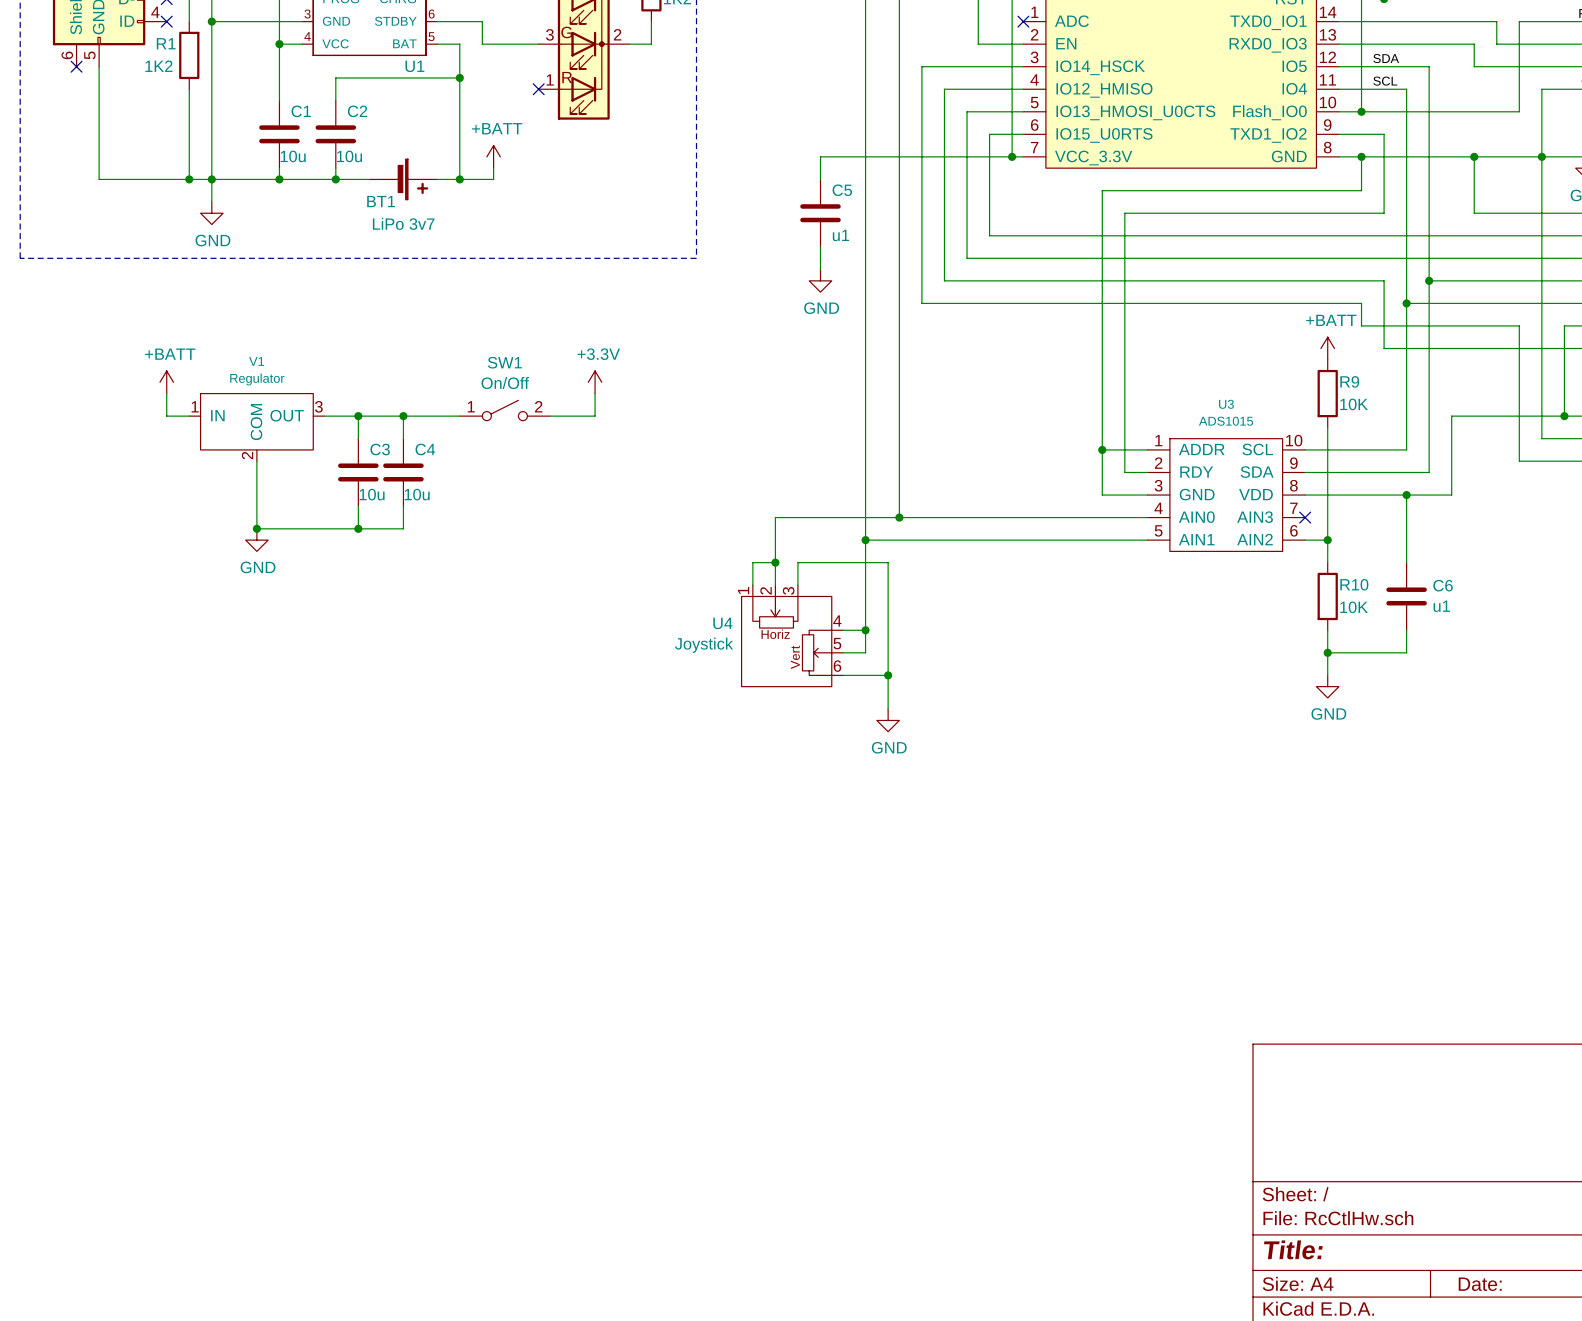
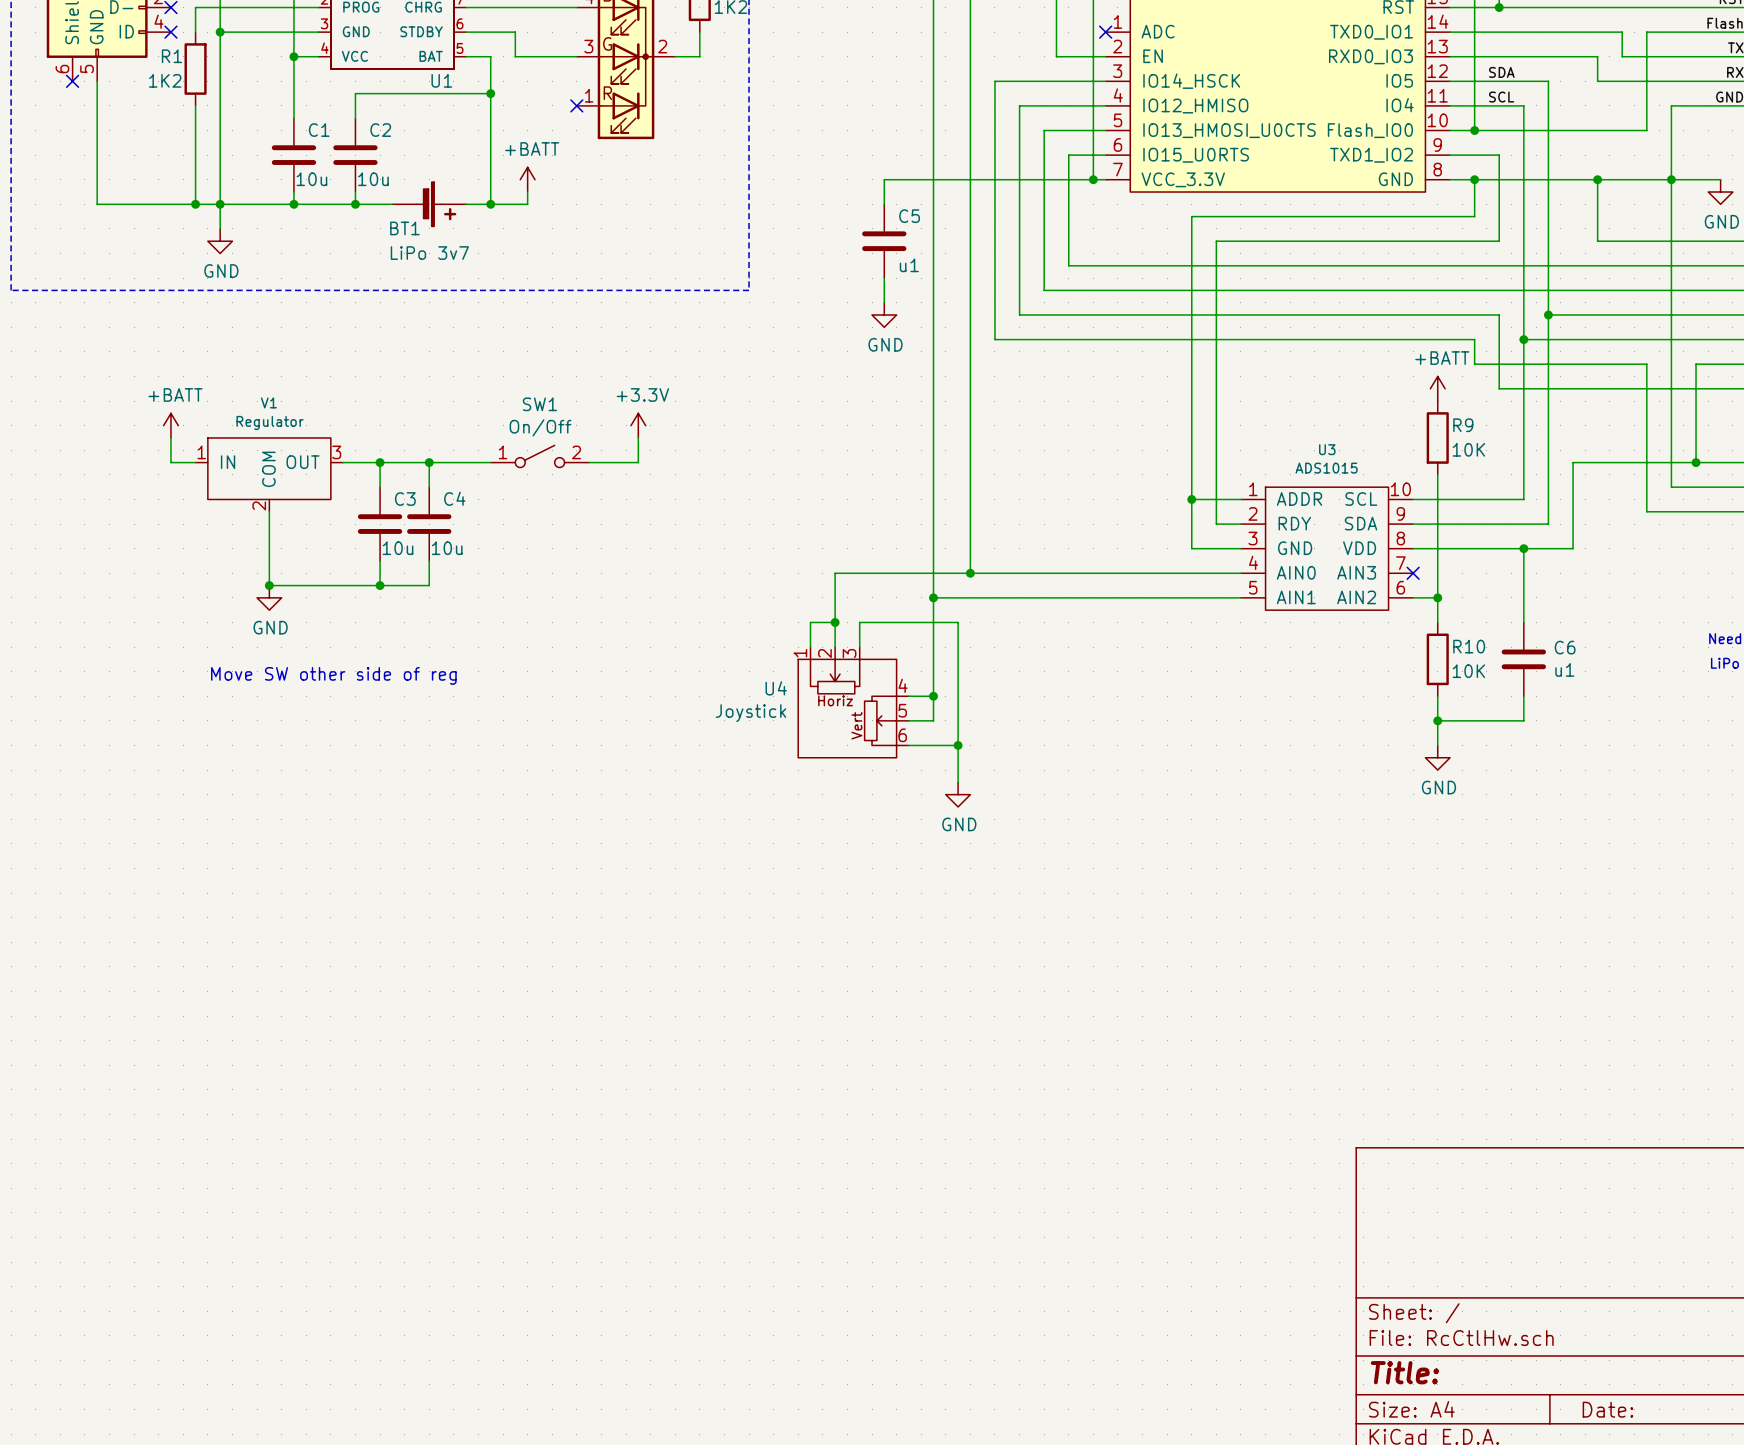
text: none -> Move SW other side of reg (333, 675)

